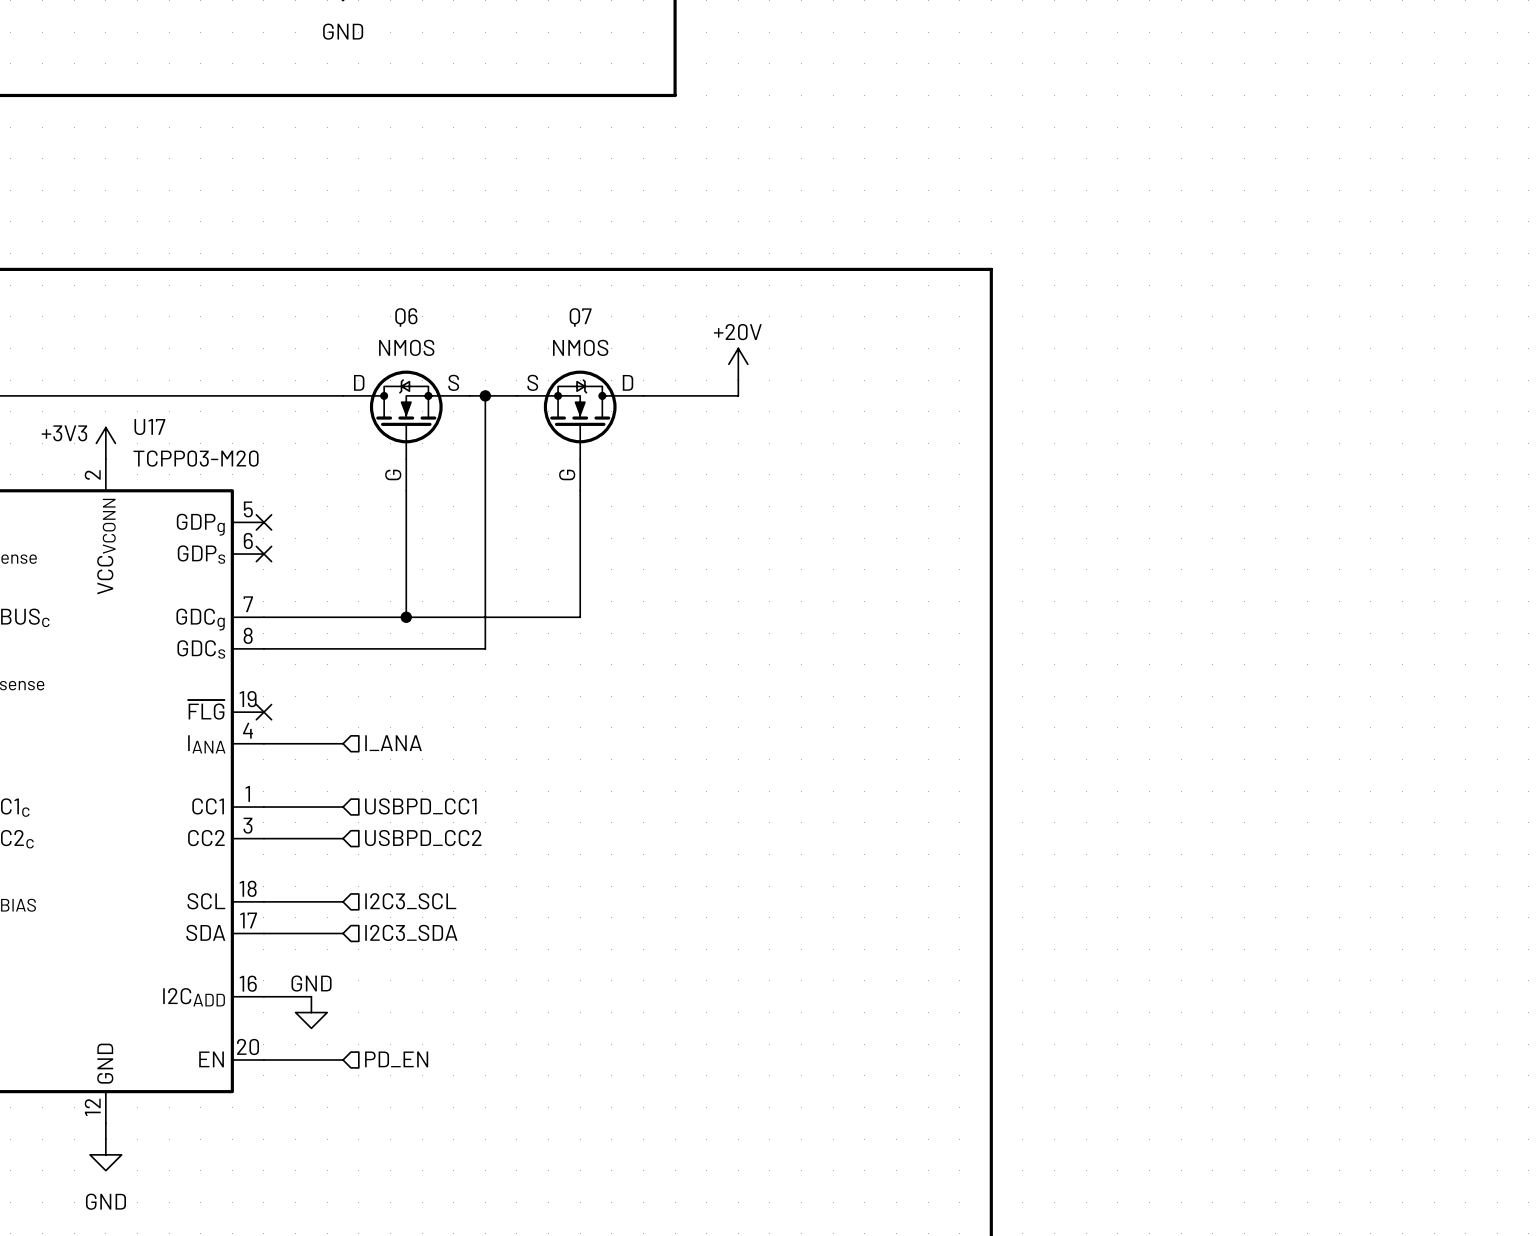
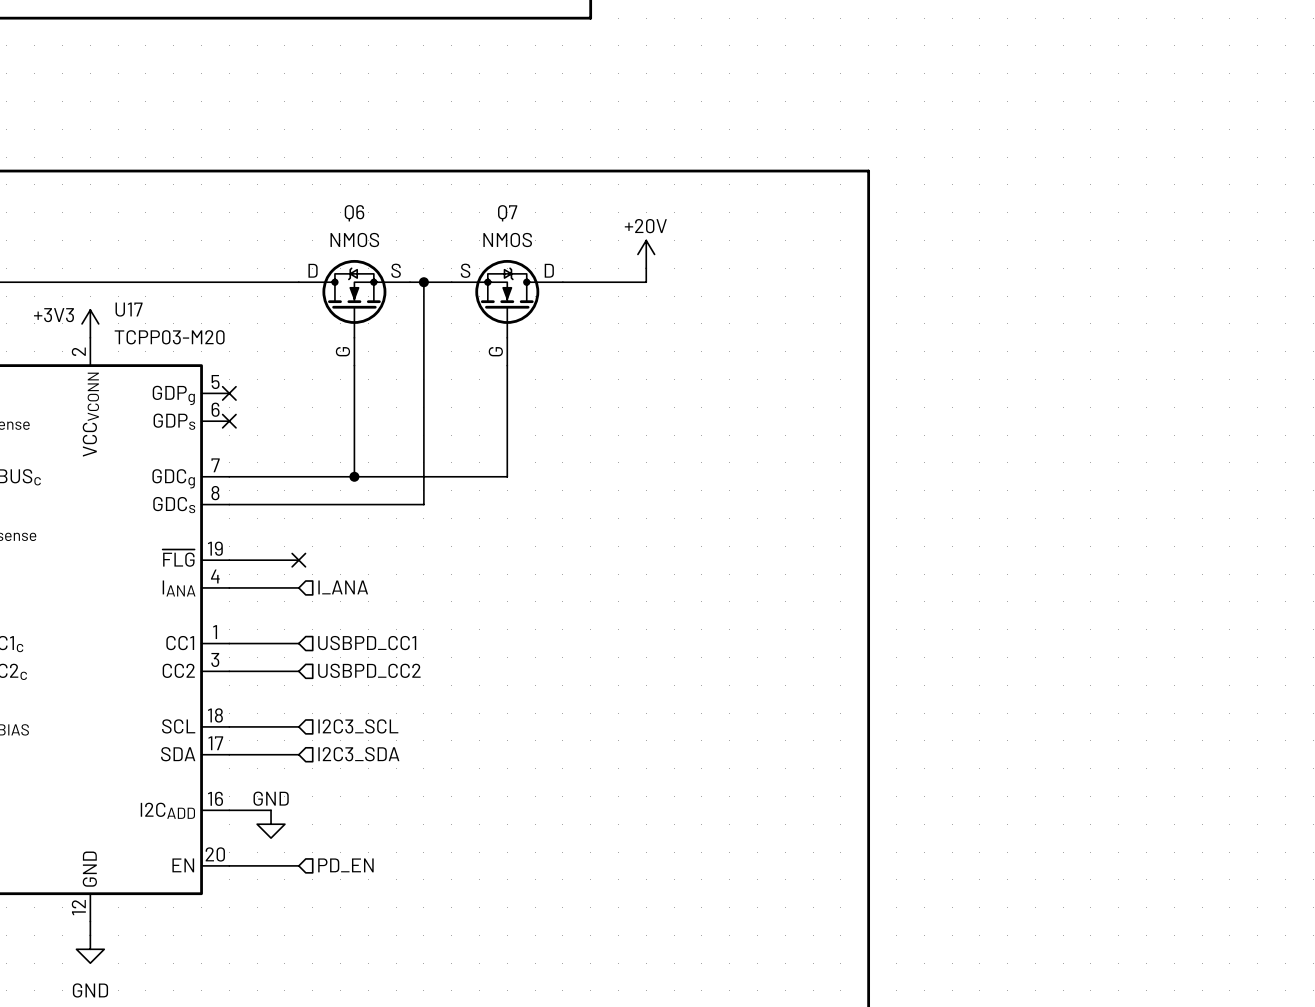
wire: none -> (229, 560) (298, 560)
no-connect mark: (263, 712) -> none
no-connect mark: none -> (298, 560)

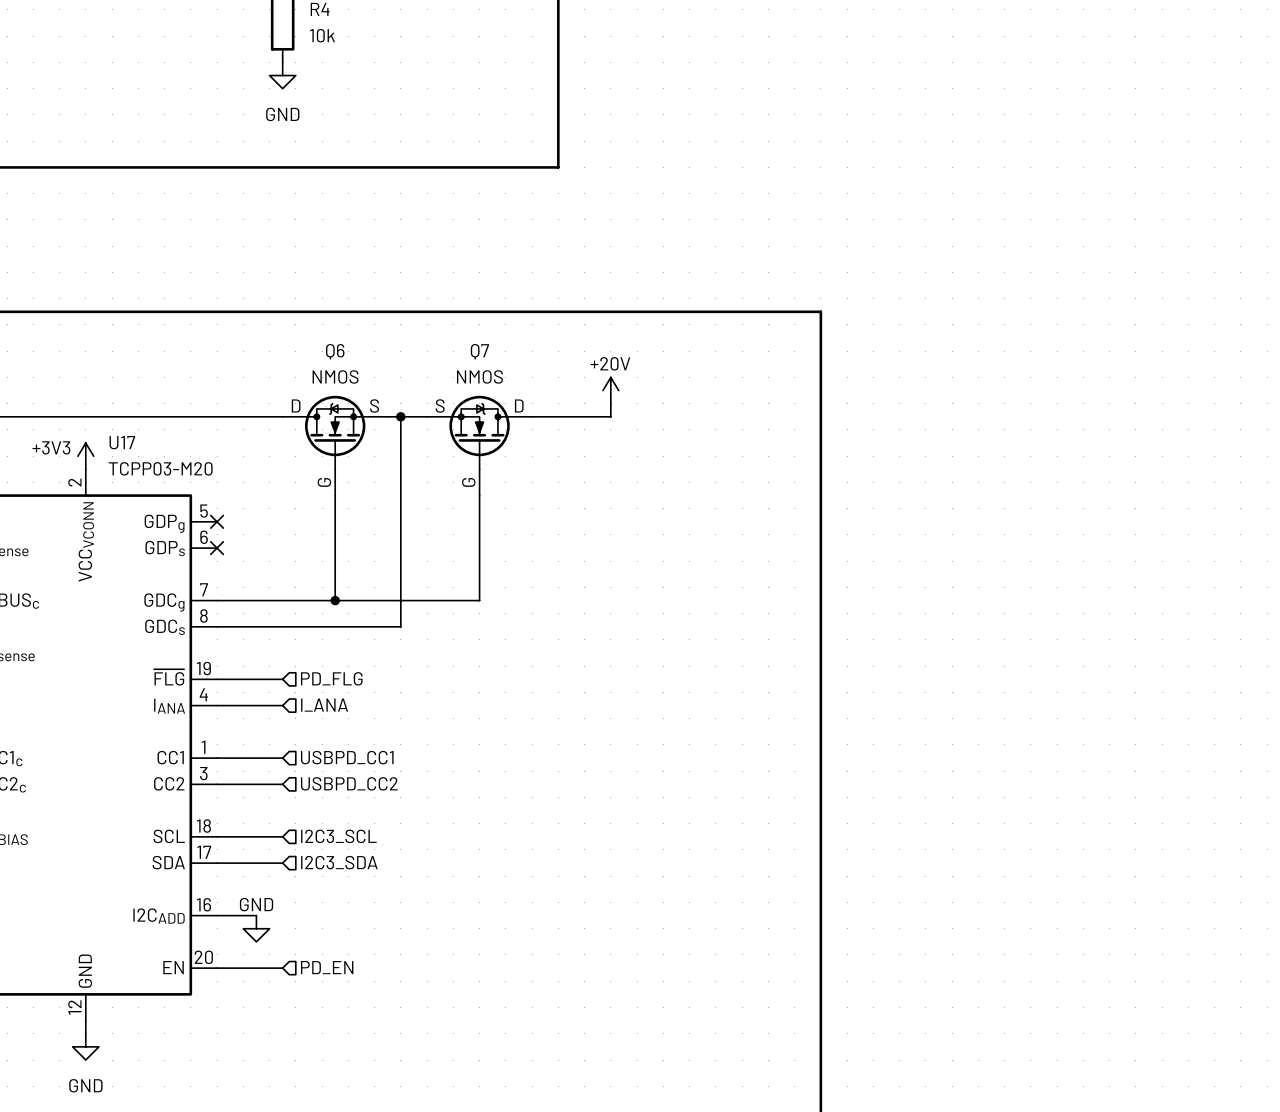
hierarchical label: none -> PD_FLG (331, 678)
no-connect mark: (298, 560) -> none

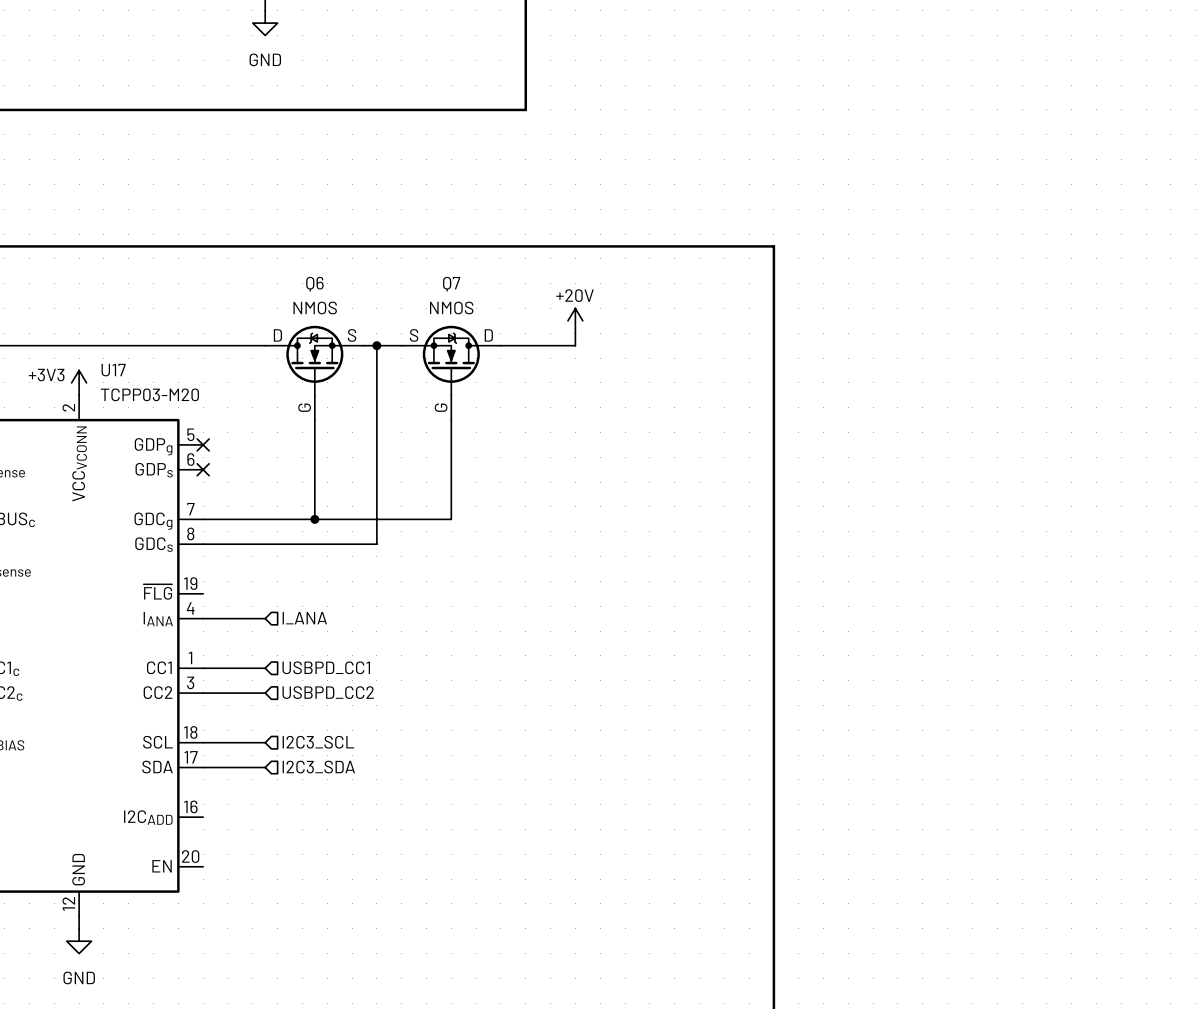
hierarchical label: PD_FLG (331, 678) -> none
wire: (217, 679) (282, 679) -> none
wire: (217, 915) (256, 915) -> none
power symbol: GND (256, 928) -> none
hierarchical label: PD_EN (327, 967) -> none
wire: (217, 968) (282, 968) -> none

